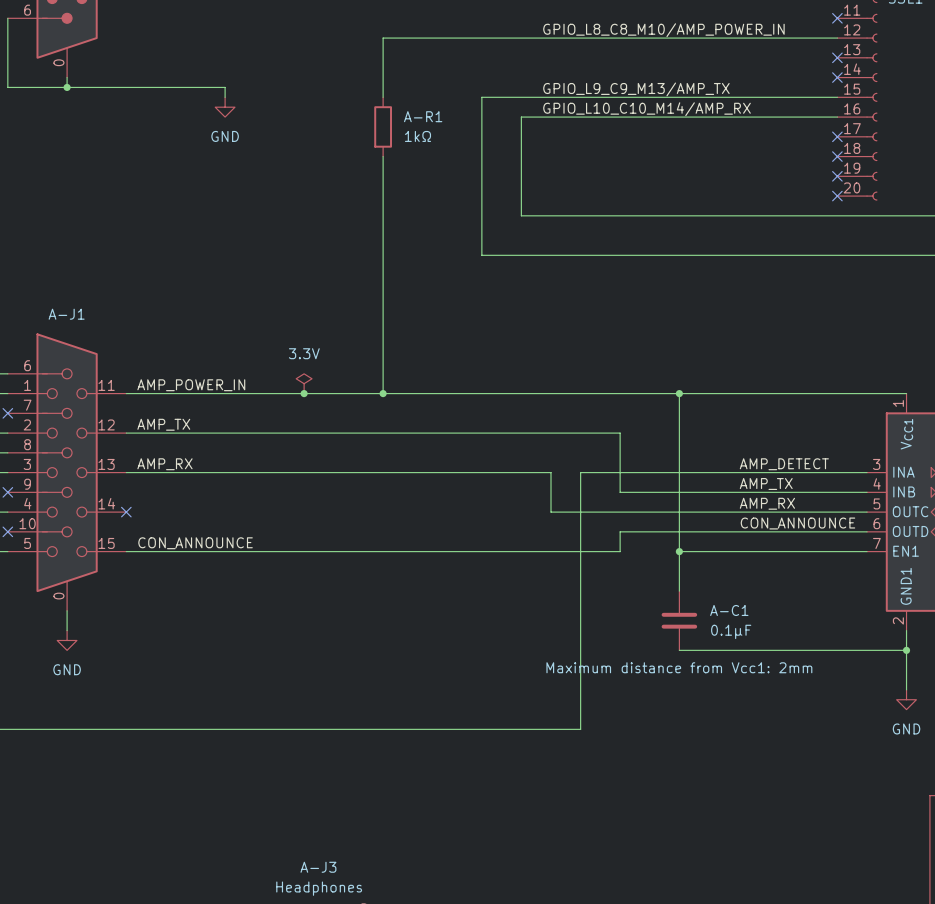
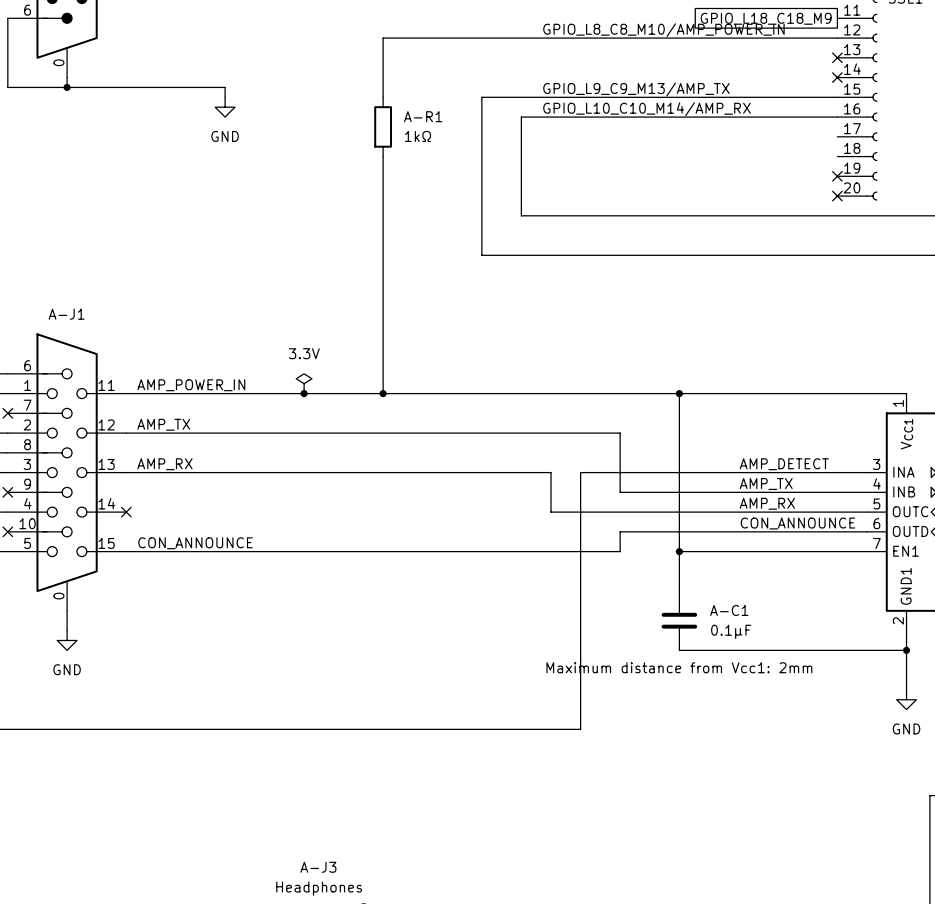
global label: none -> GPIO_L18_C18_M9 (766, 18)
no-connect mark: (837, 18) -> none
no-connect mark: (837, 136) -> none
no-connect mark: (837, 156) -> none

